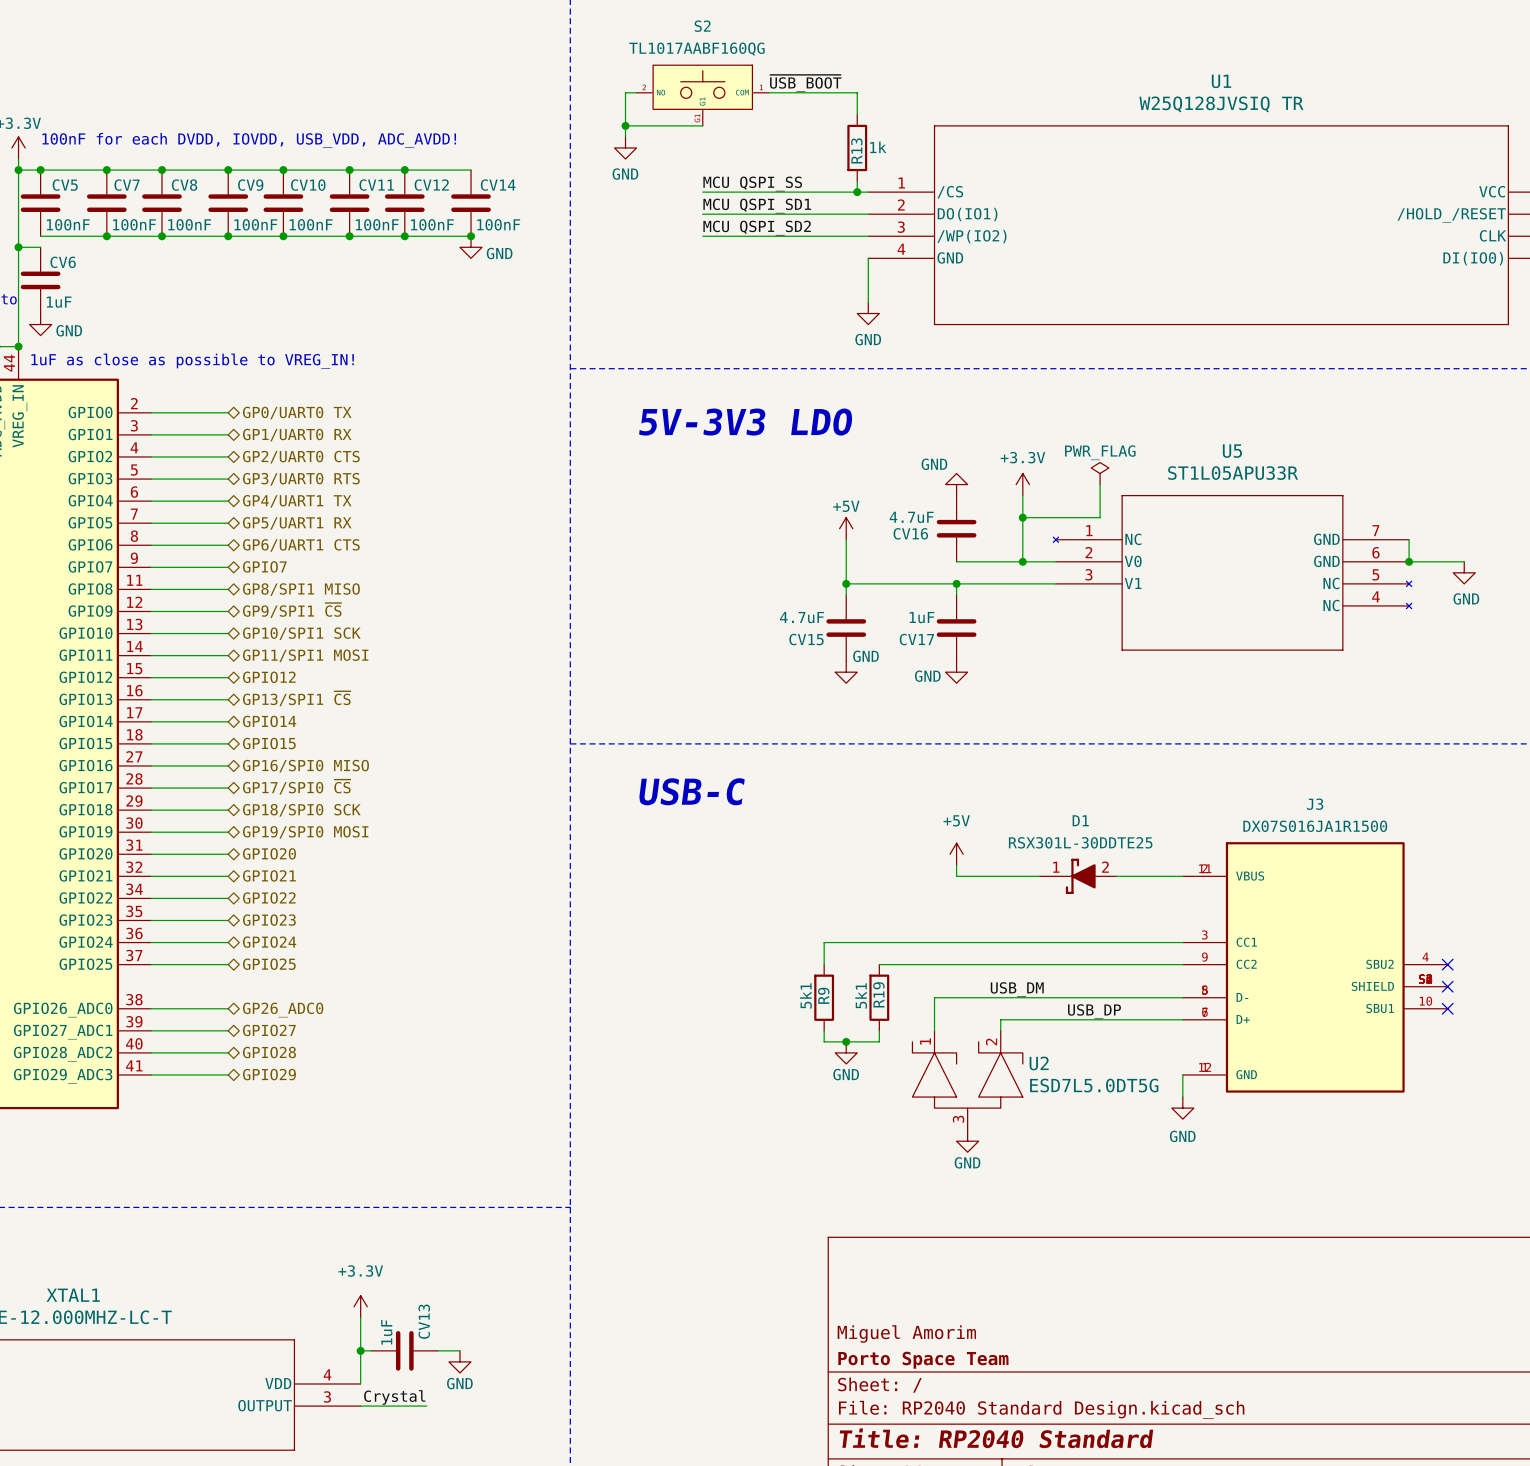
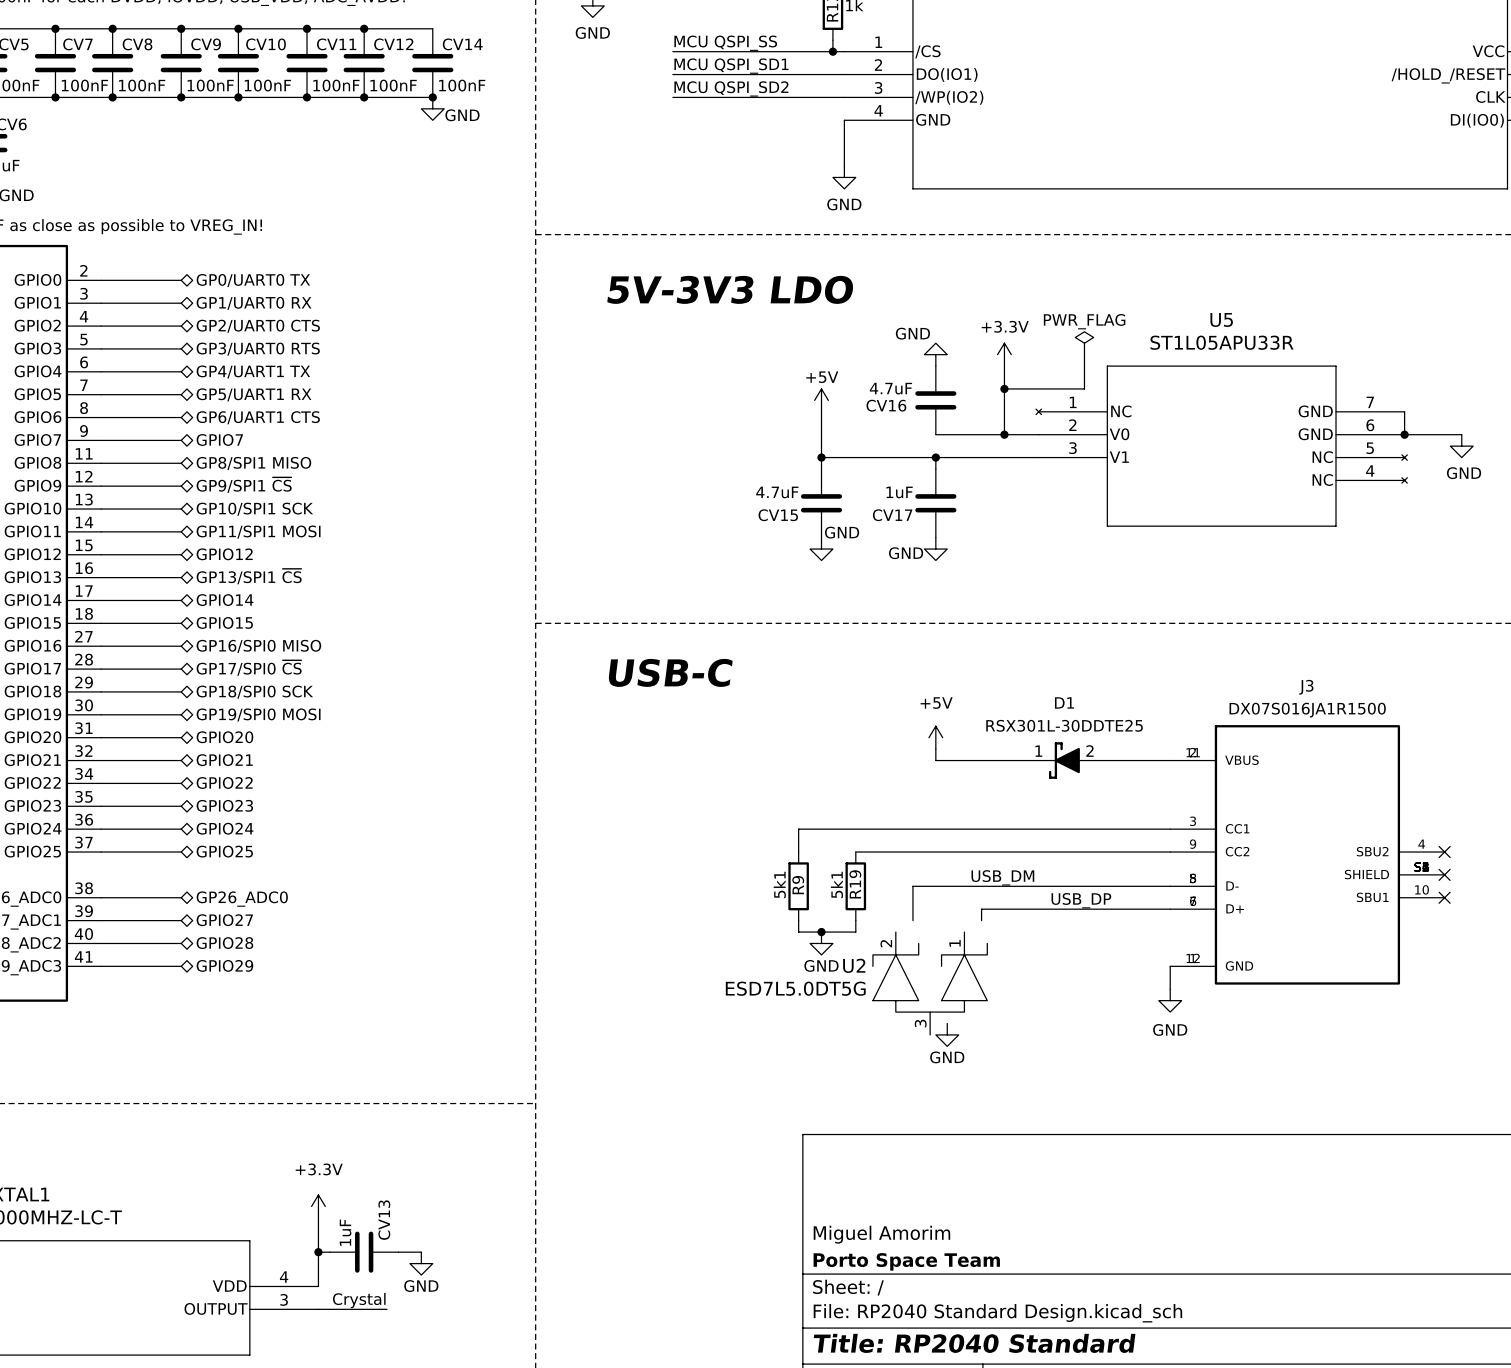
U2 flip: as is (967, 1074) -> left-right (930, 977)

